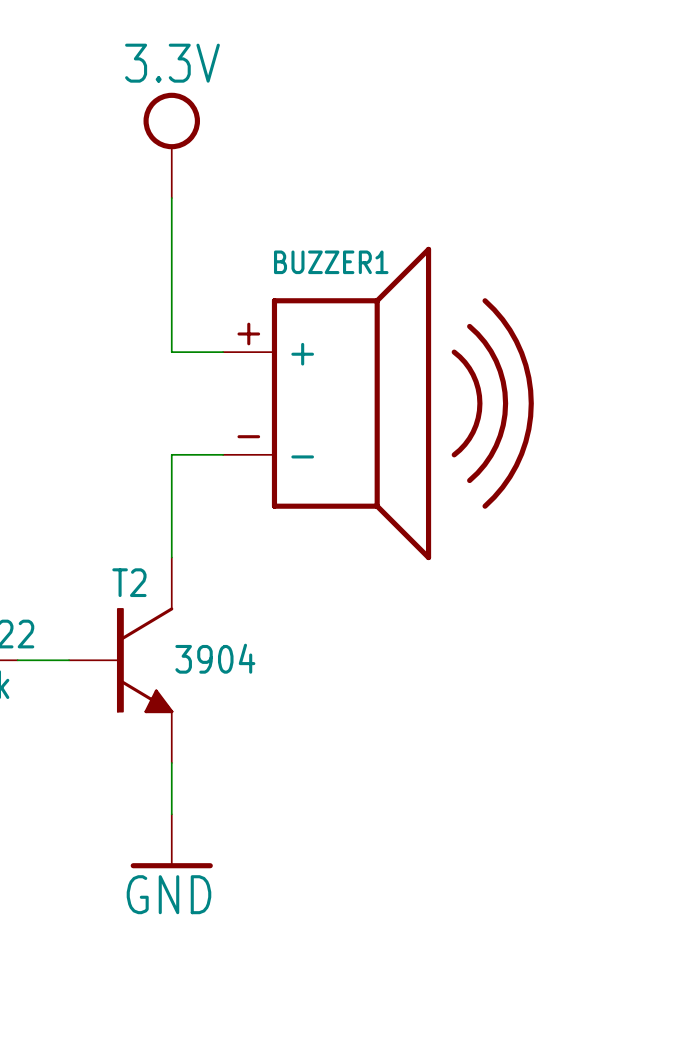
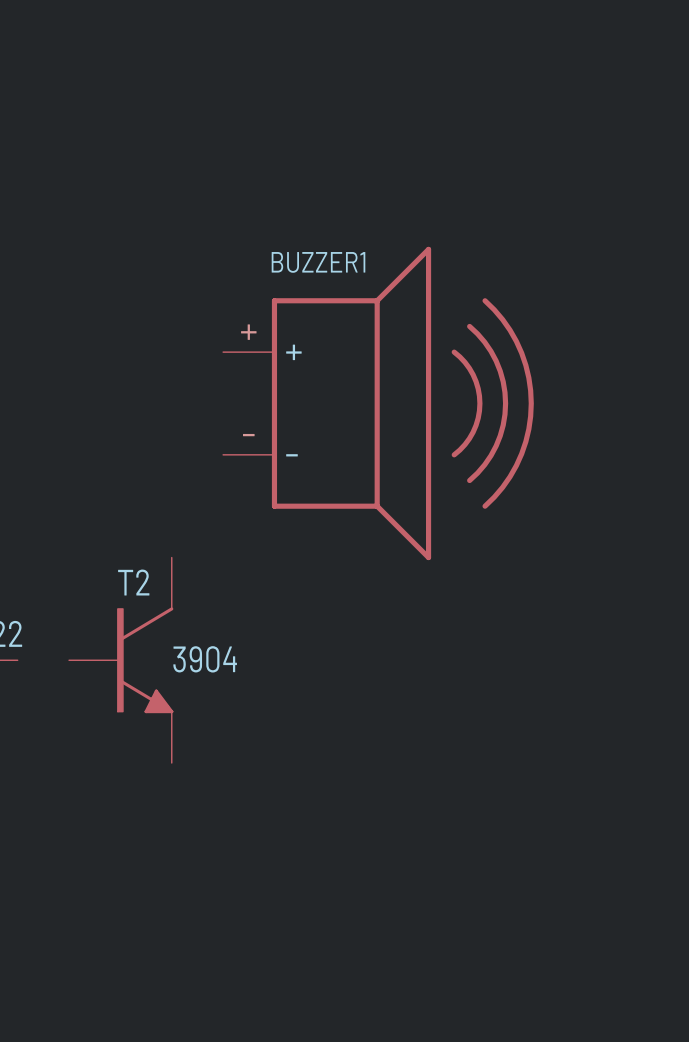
power symbol: 3.3V (171, 145) -> none
wire: (171, 198) (171, 352) (223, 352) -> none
wire: (223, 454) (171, 454) (171, 557) -> none
wire: (17, 660) (69, 660) -> none
wire: (171, 762) (171, 814) -> none
power symbol: GND (171, 841) -> none

